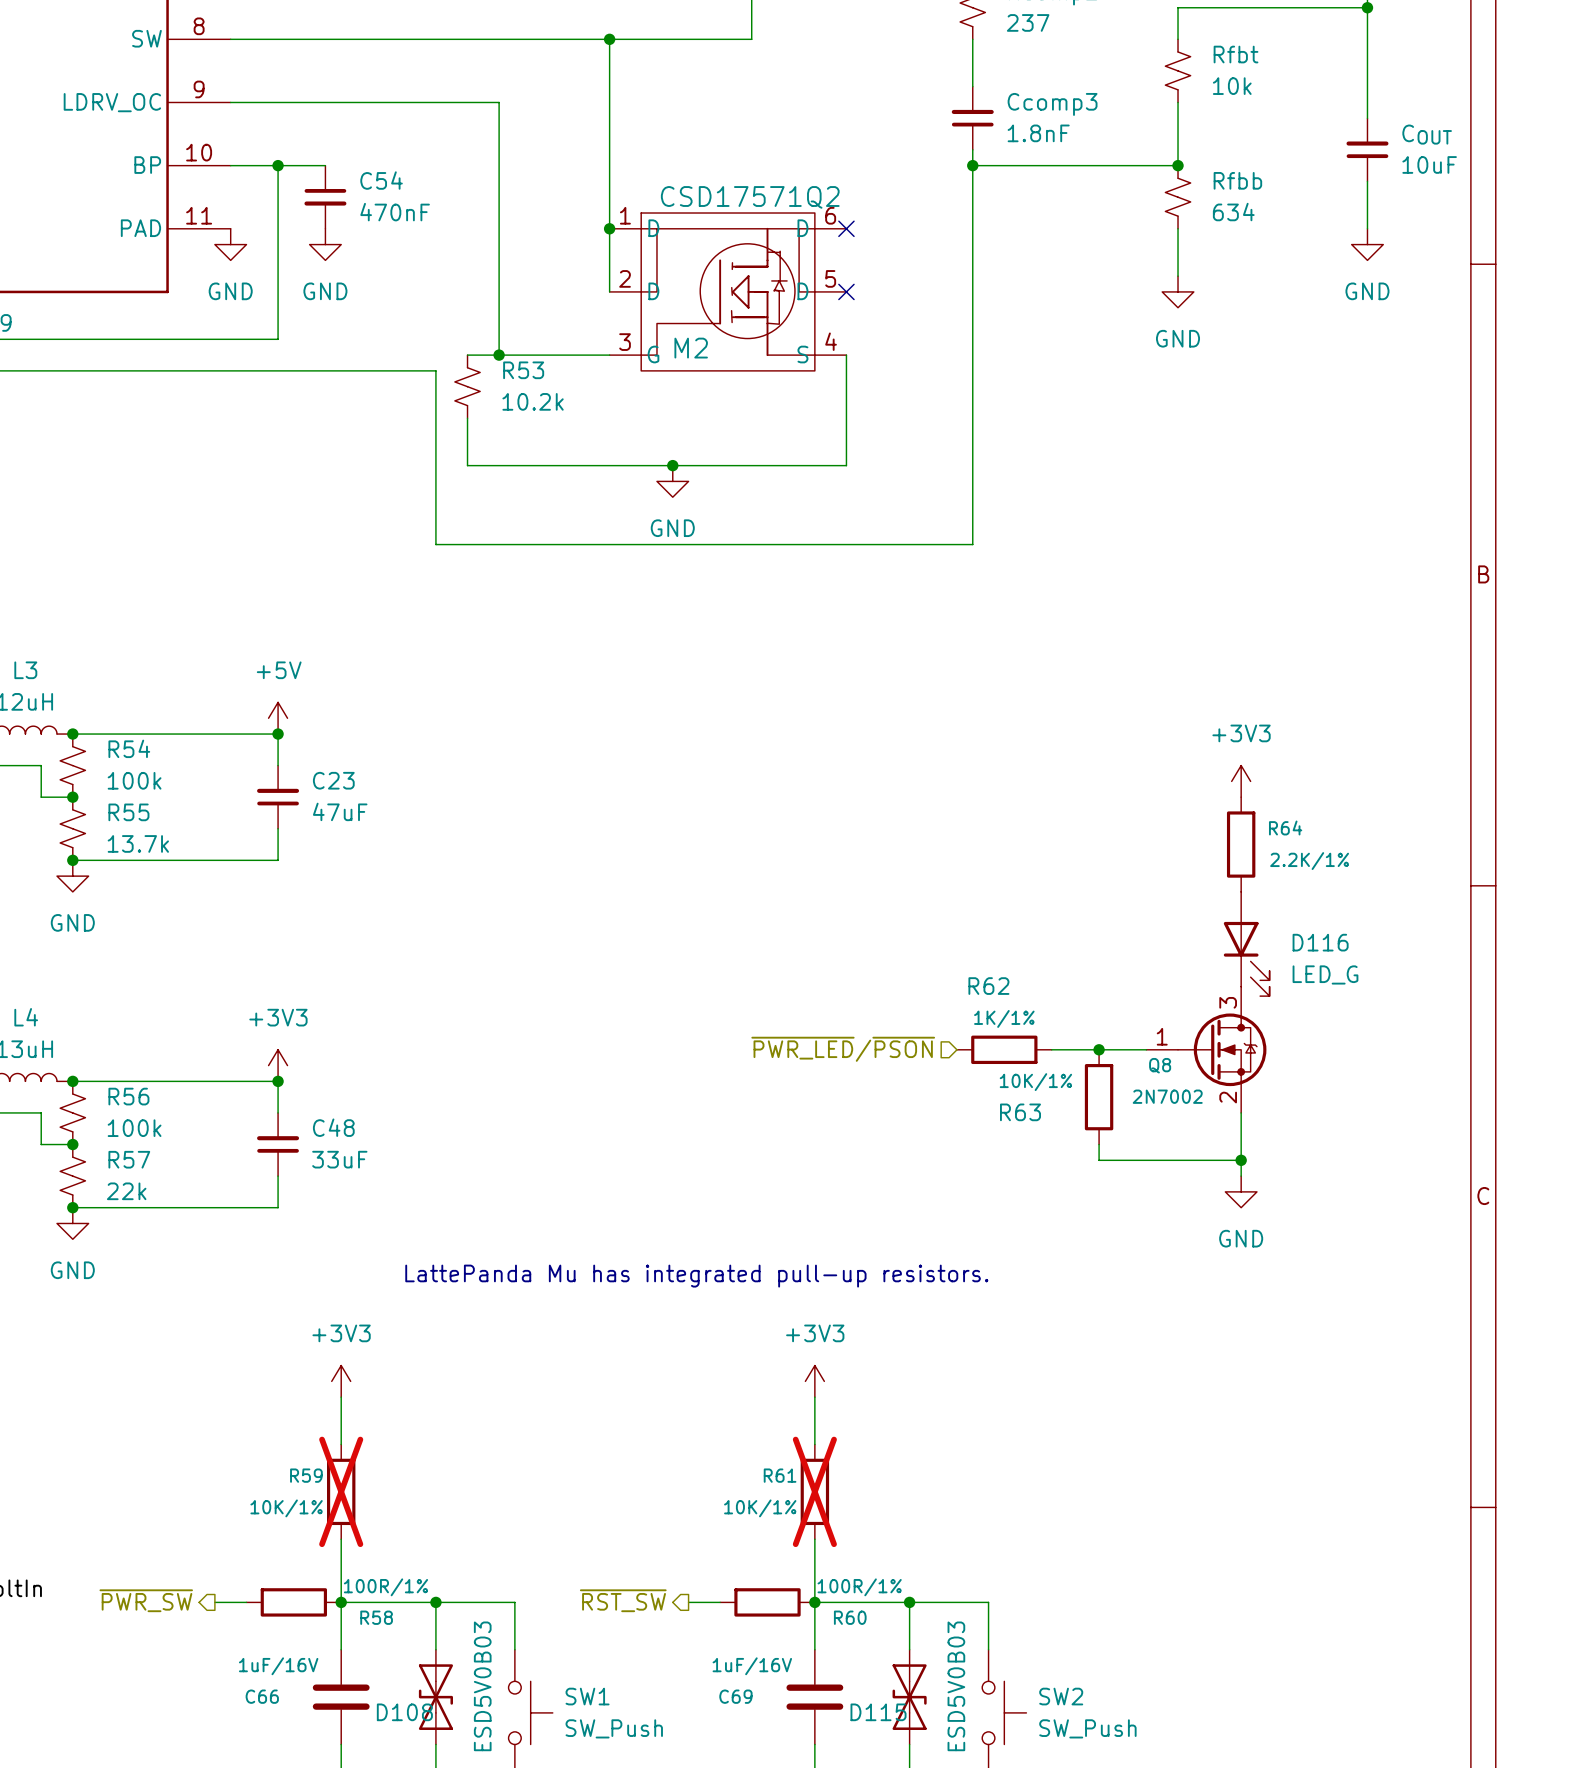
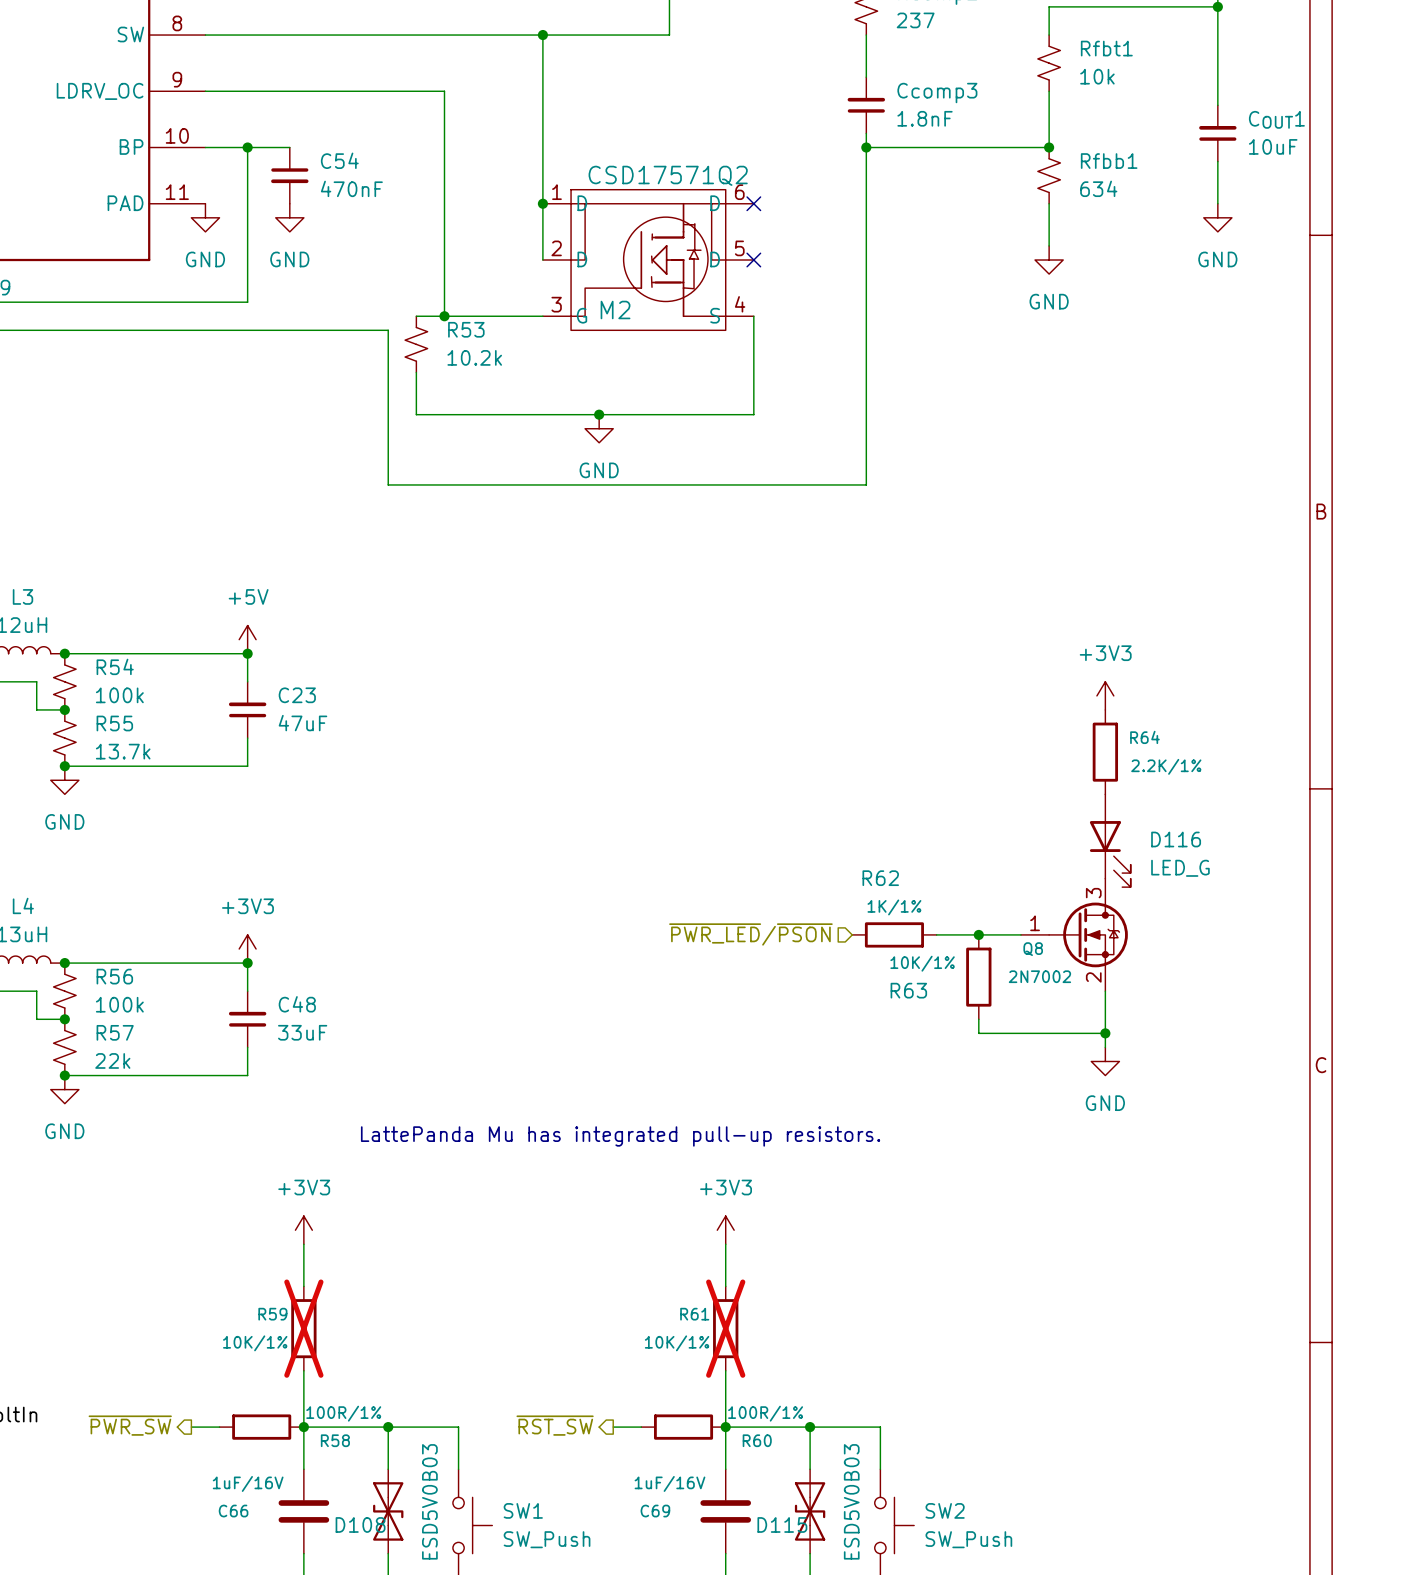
Rfbt name: Rfbt (1236, 54) -> Rfbt1 (1106, 48)
COUT name: COUT (1427, 134) -> COUT1 (1276, 119)
Rfbb name: Rfbb (1237, 180) -> Rfbb1 (1109, 161)

